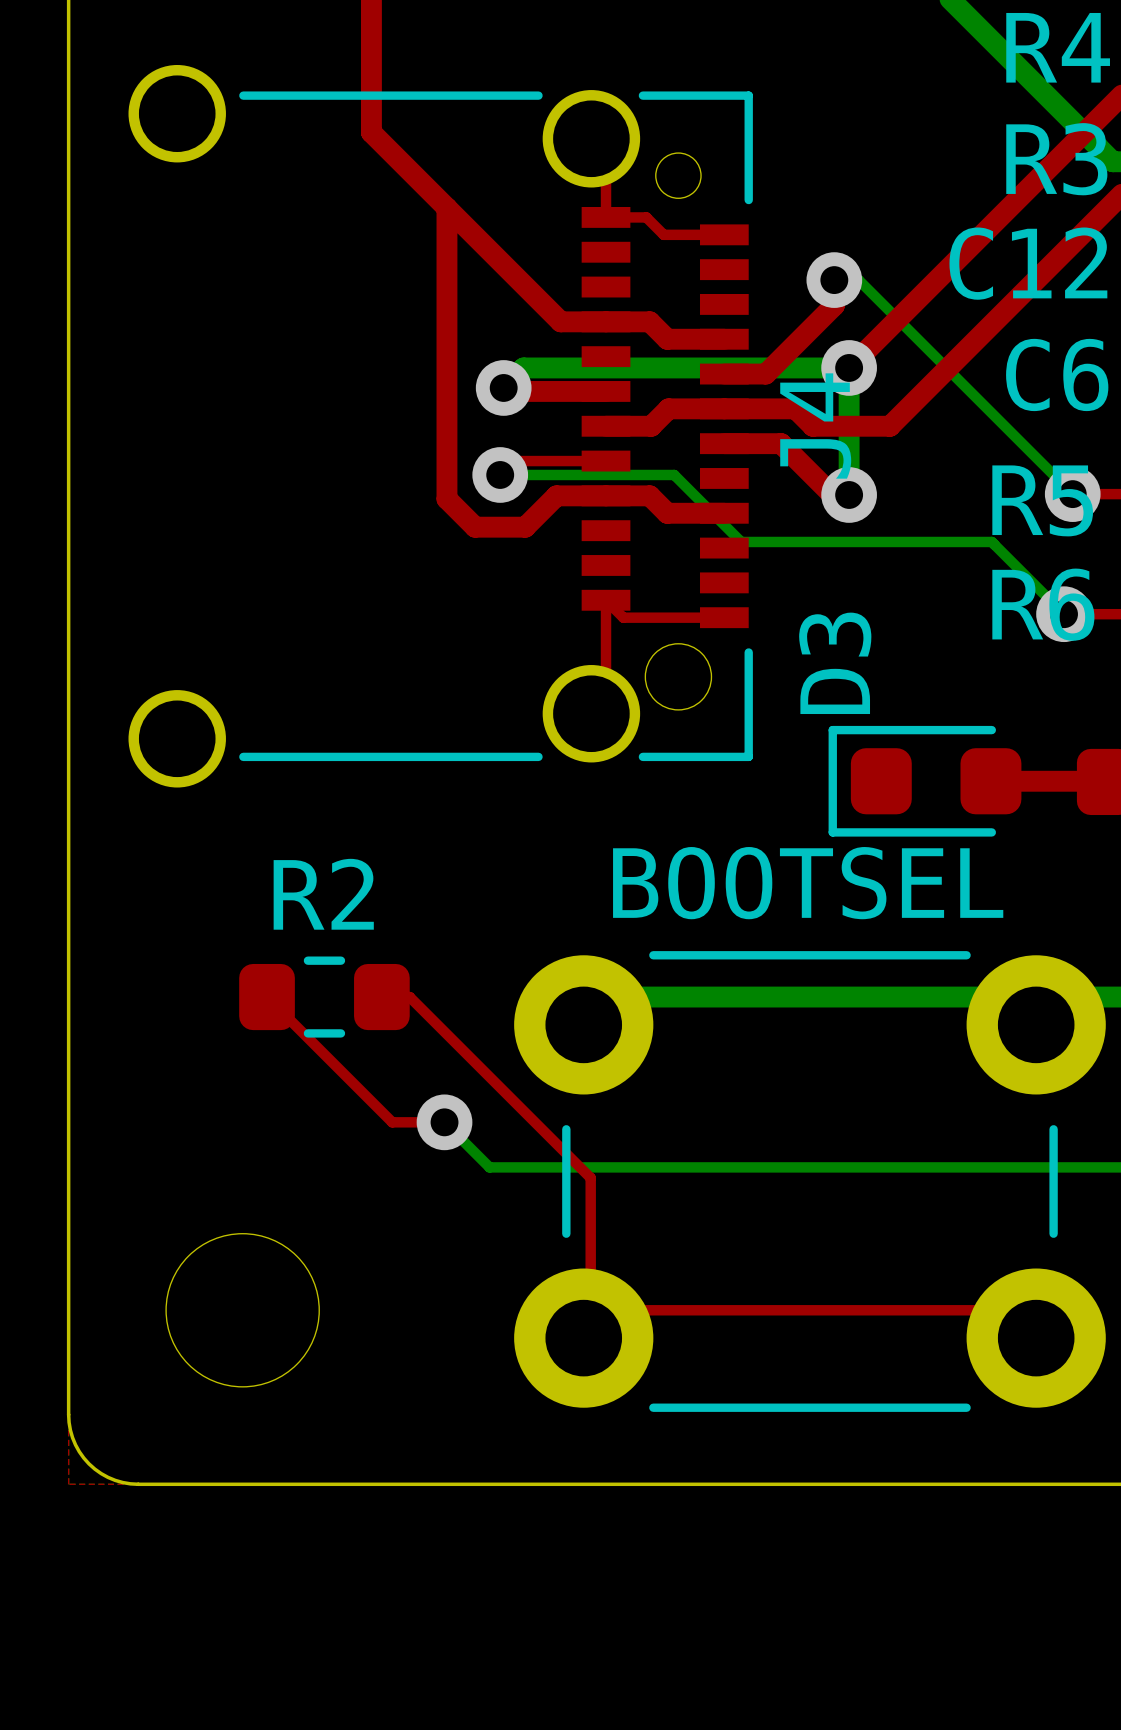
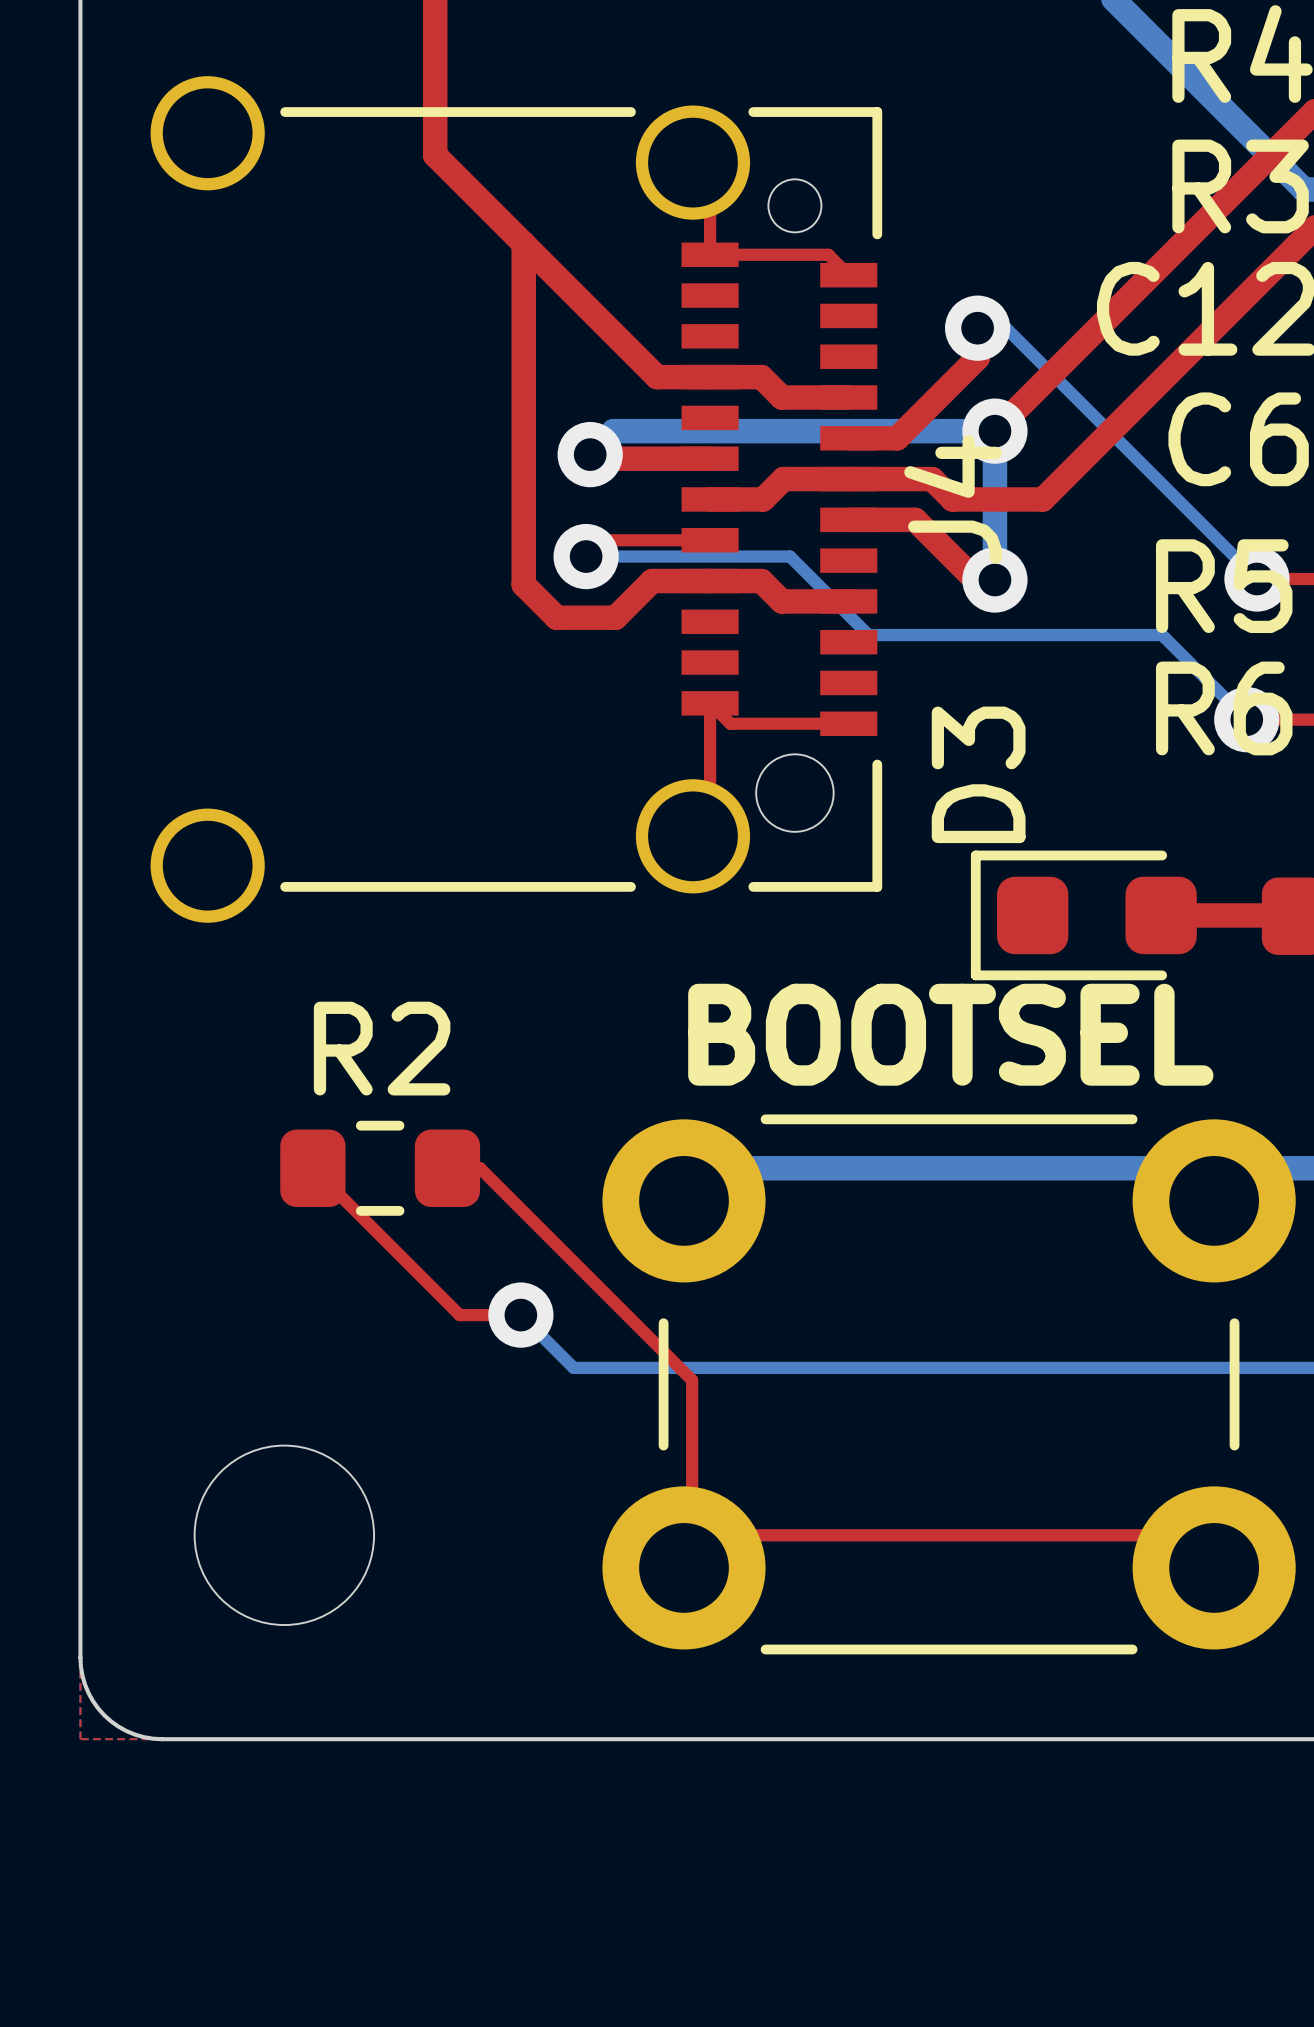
top track: (646, 217) (663, 234) (724, 234) -> (757, 254) (828, 254) (848, 275)

